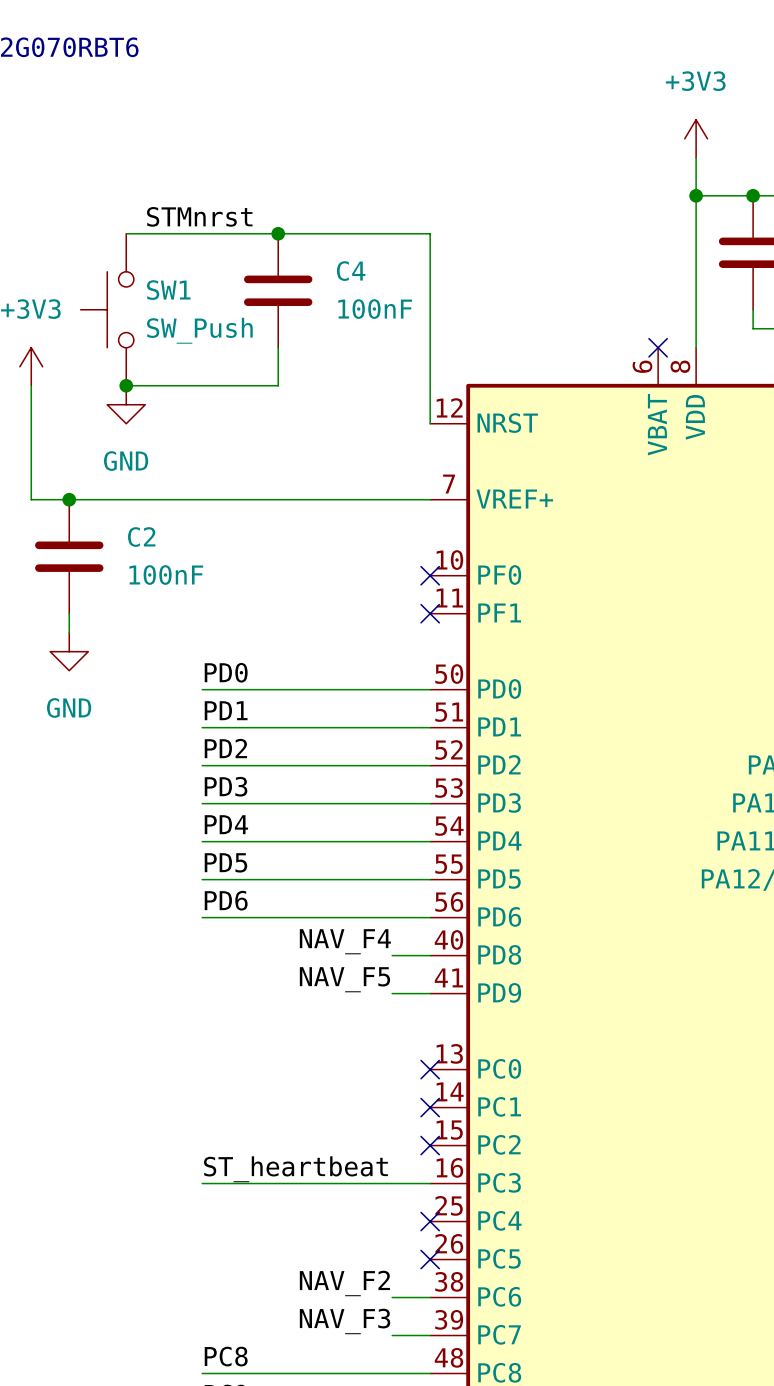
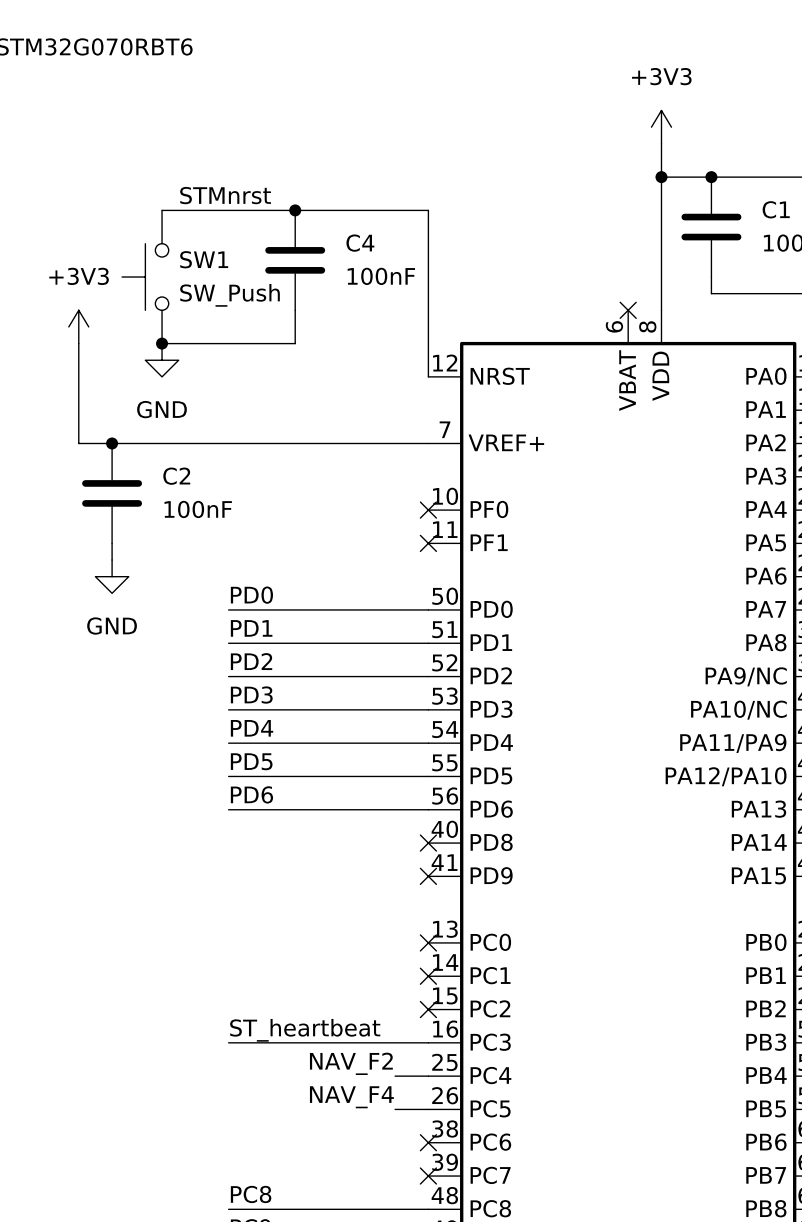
label position: NAV_F4 (345, 941) -> NAV_F4 (351, 1097)
wire: (392, 955) (430, 955) -> none
no-connect mark: none -> (428, 843)
label: NAV_F5 (344, 979) -> none
wire: (392, 993) (430, 993) -> none
no-connect mark: none -> (428, 876)
no-connect mark: (430, 1221) -> none
no-connect mark: (430, 1259) -> none
label position: NAV_F2 (344, 1283) -> NAV_F2 (351, 1063)
wire: (392, 1297) (430, 1297) -> (395, 1076) (428, 1076)
no-connect mark: none -> (428, 1142)
label: NAV_F3 (345, 1321) -> none
wire: (392, 1335) (430, 1335) -> (395, 1109) (428, 1109)
no-connect mark: none -> (428, 1176)

